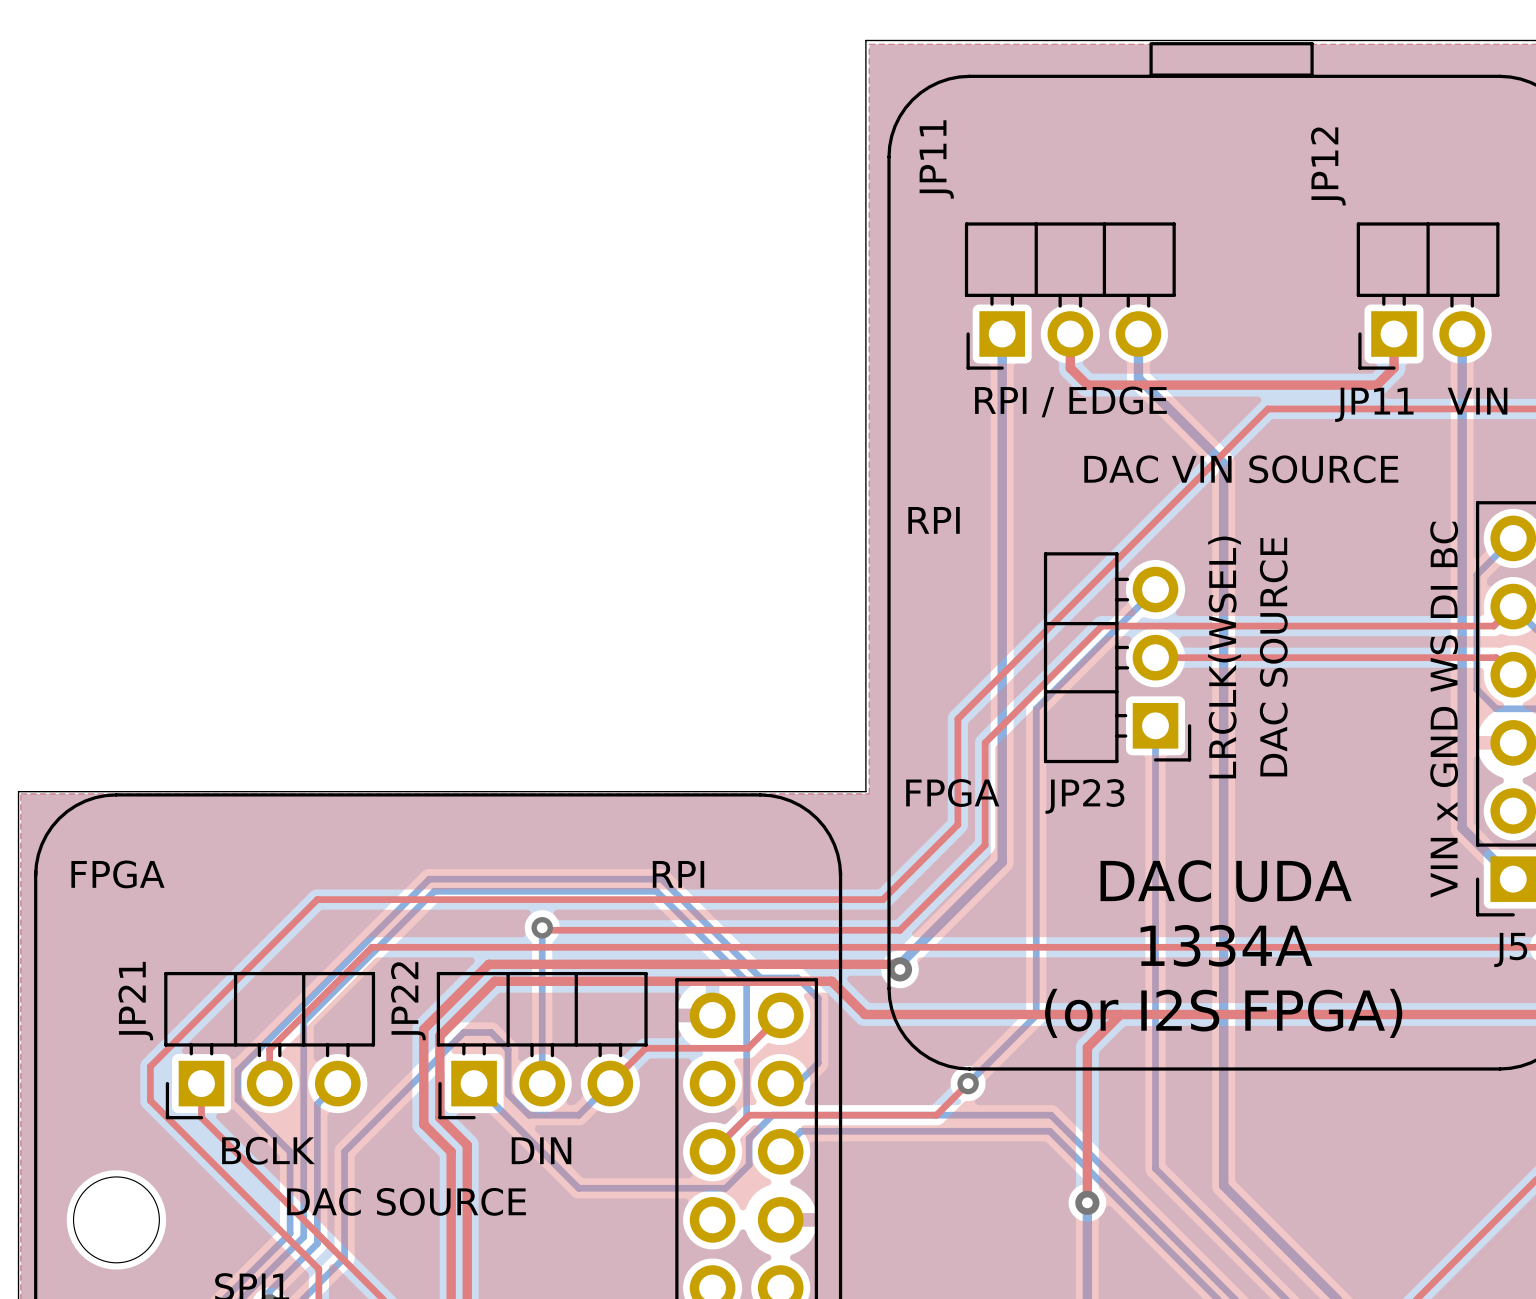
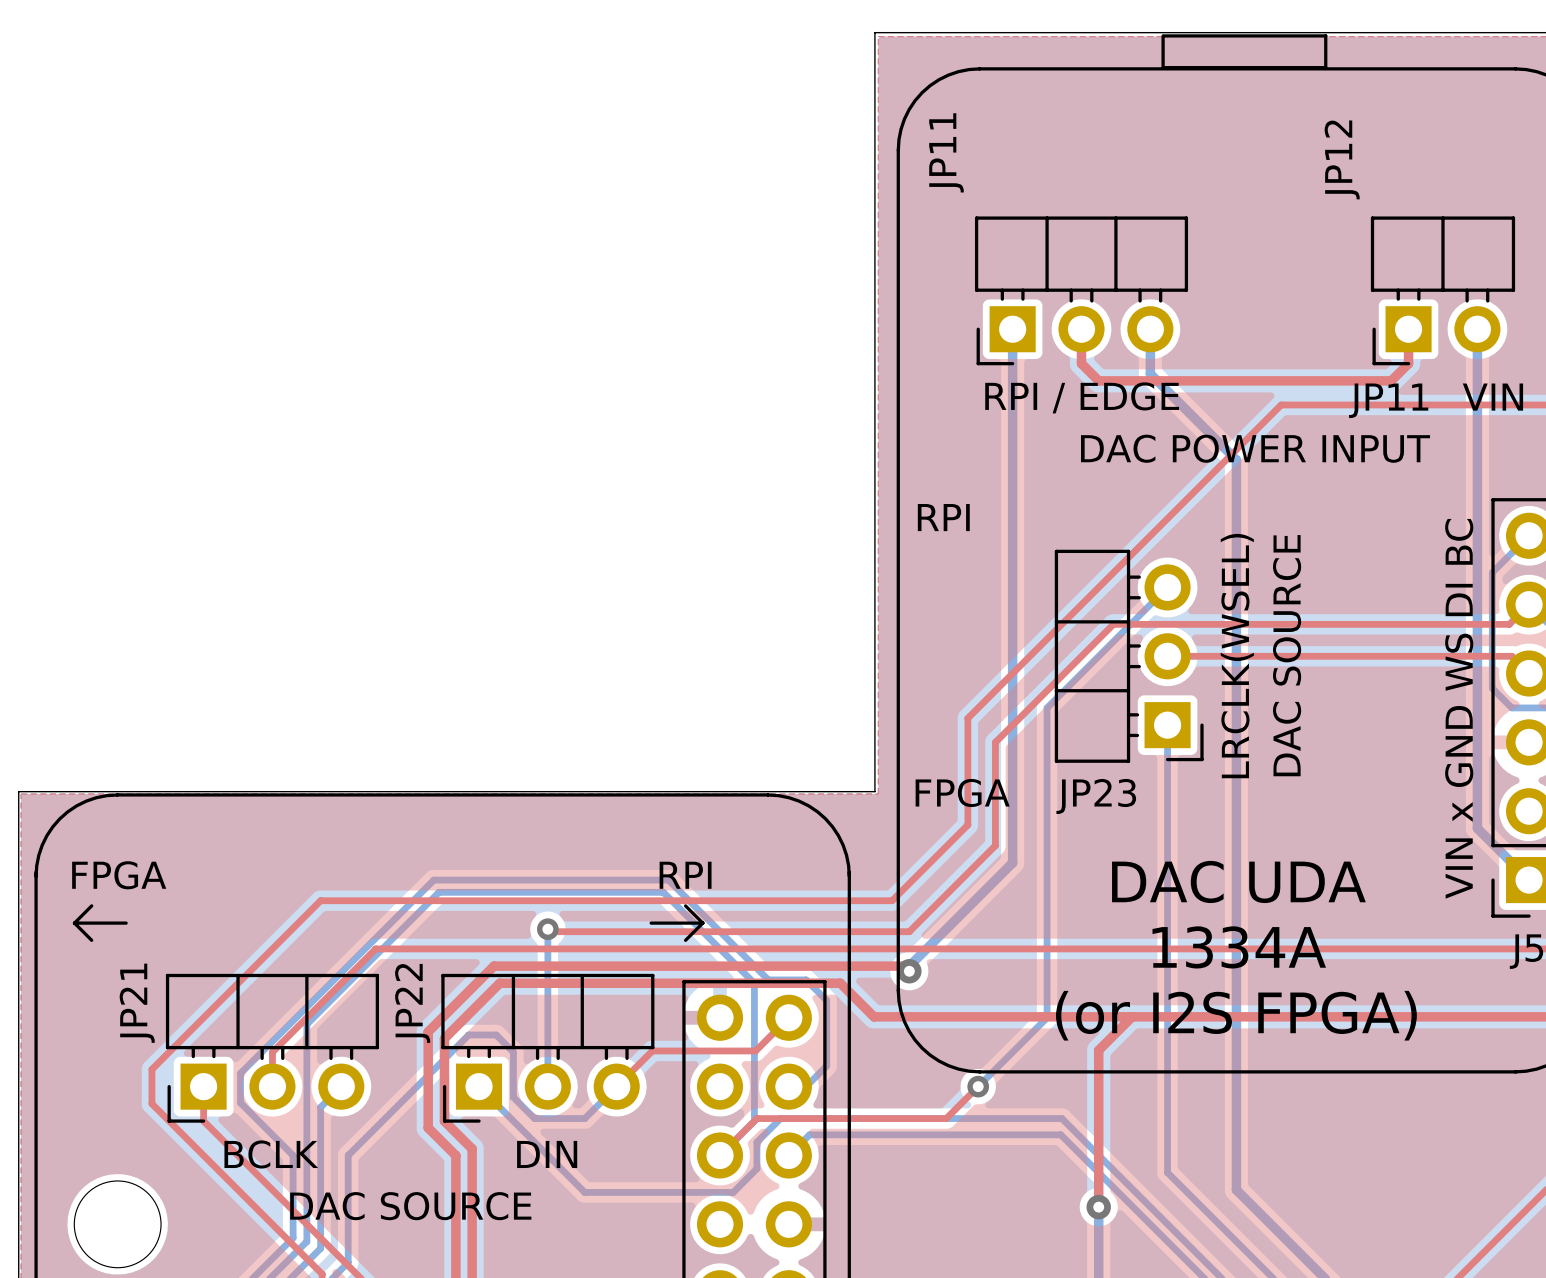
text: DAC VIN SOURCE (1241, 469) -> DAC POWER INPUT (1255, 448)
line: none -> (91, 905) (74, 923)
line: none -> (685, 905) (702, 923)
line: none -> (74, 923) (126, 923)
line: none -> (74, 923) (91, 940)
line: none -> (651, 923) (702, 923)
line: none -> (702, 923) (685, 940)

